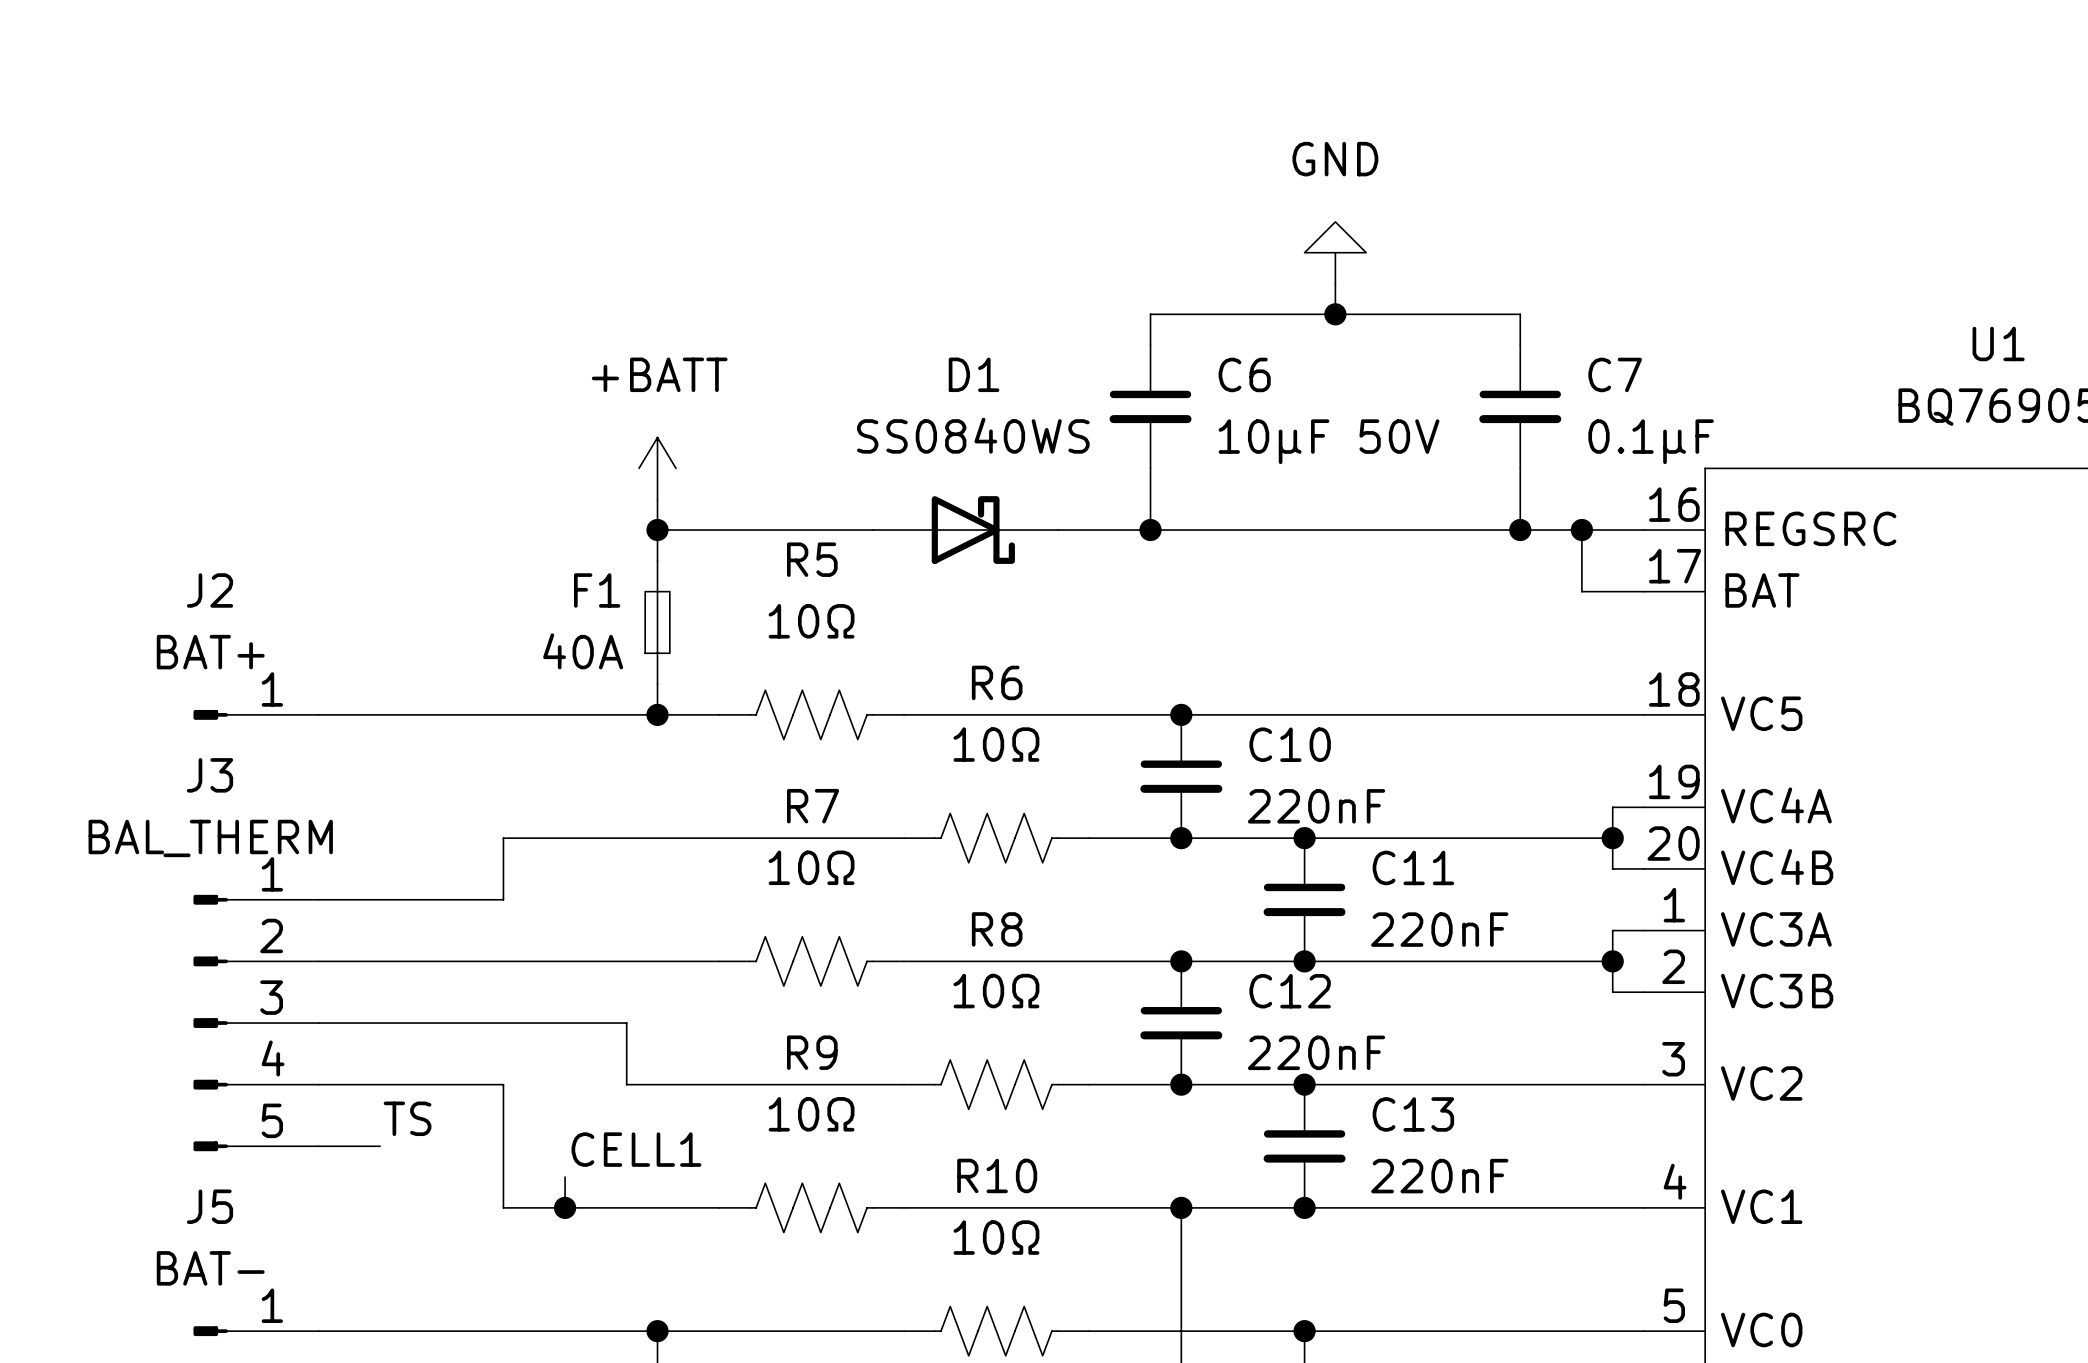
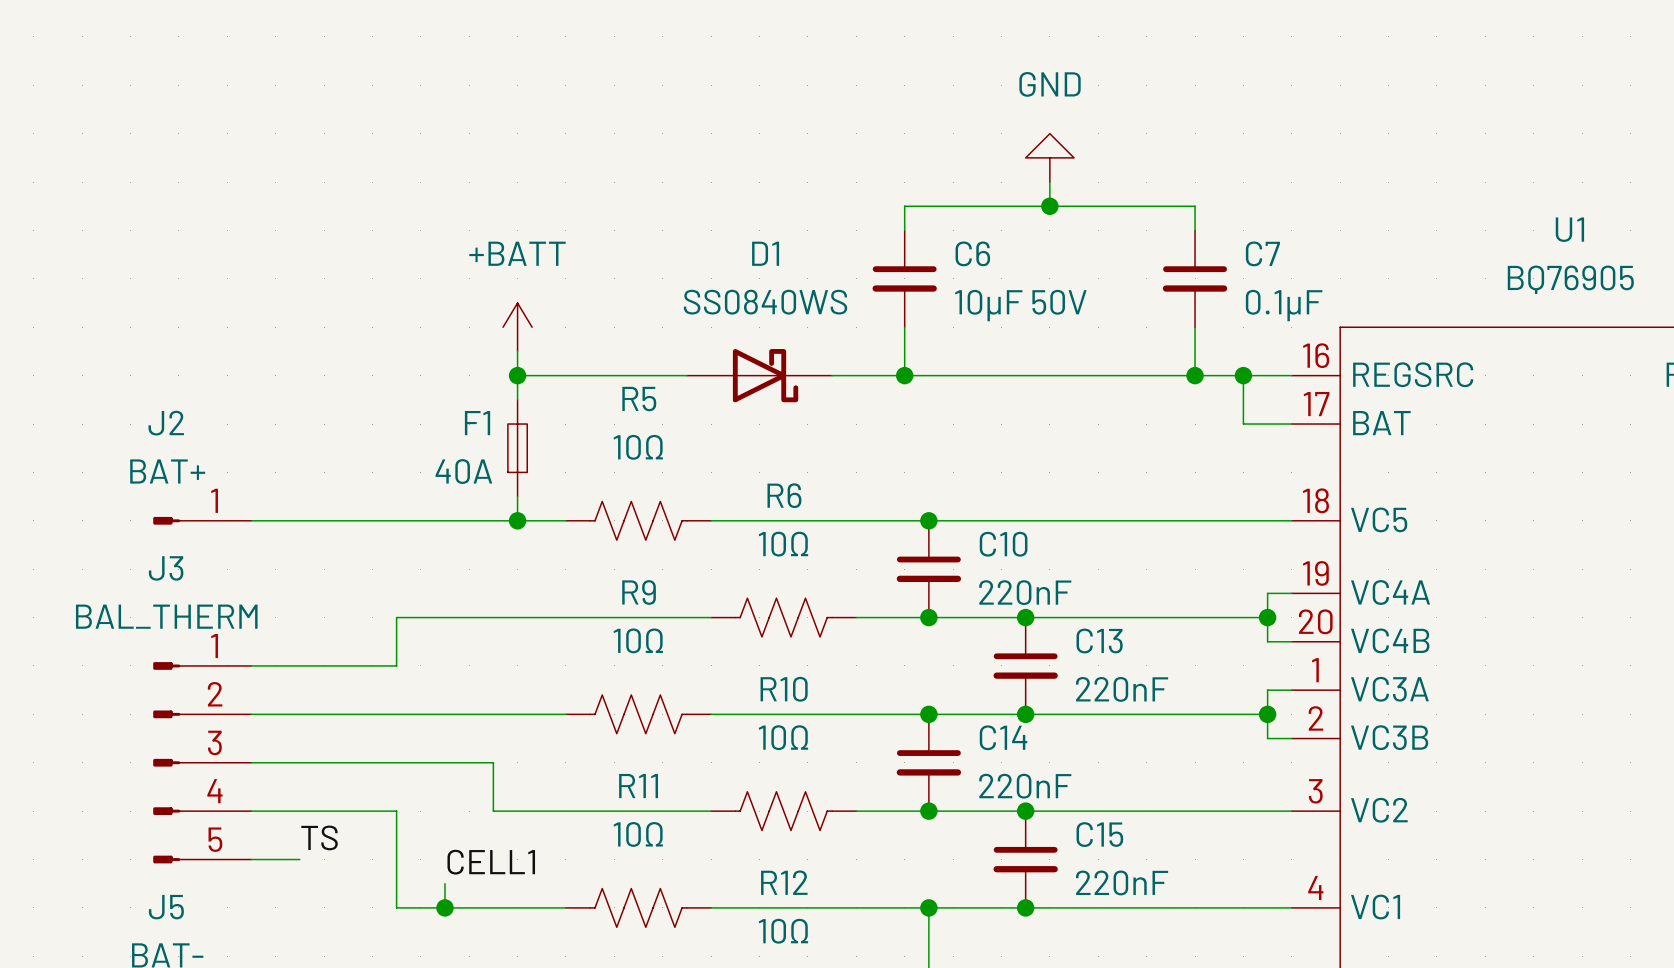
R7 name: R7 (813, 806) -> R9 (639, 592)
C11 name: C11 (1413, 867) -> C13 (1099, 641)
R8 name: R8 (997, 929) -> R10 (784, 689)
C12 name: C12 (1290, 991) -> C14 (1003, 737)
R9 name: R9 (812, 1052) -> R11 (638, 786)
C13 name: C13 (1413, 1114) -> C15 (1099, 834)
R10 name: R10 (997, 1175) -> R12 (784, 882)

